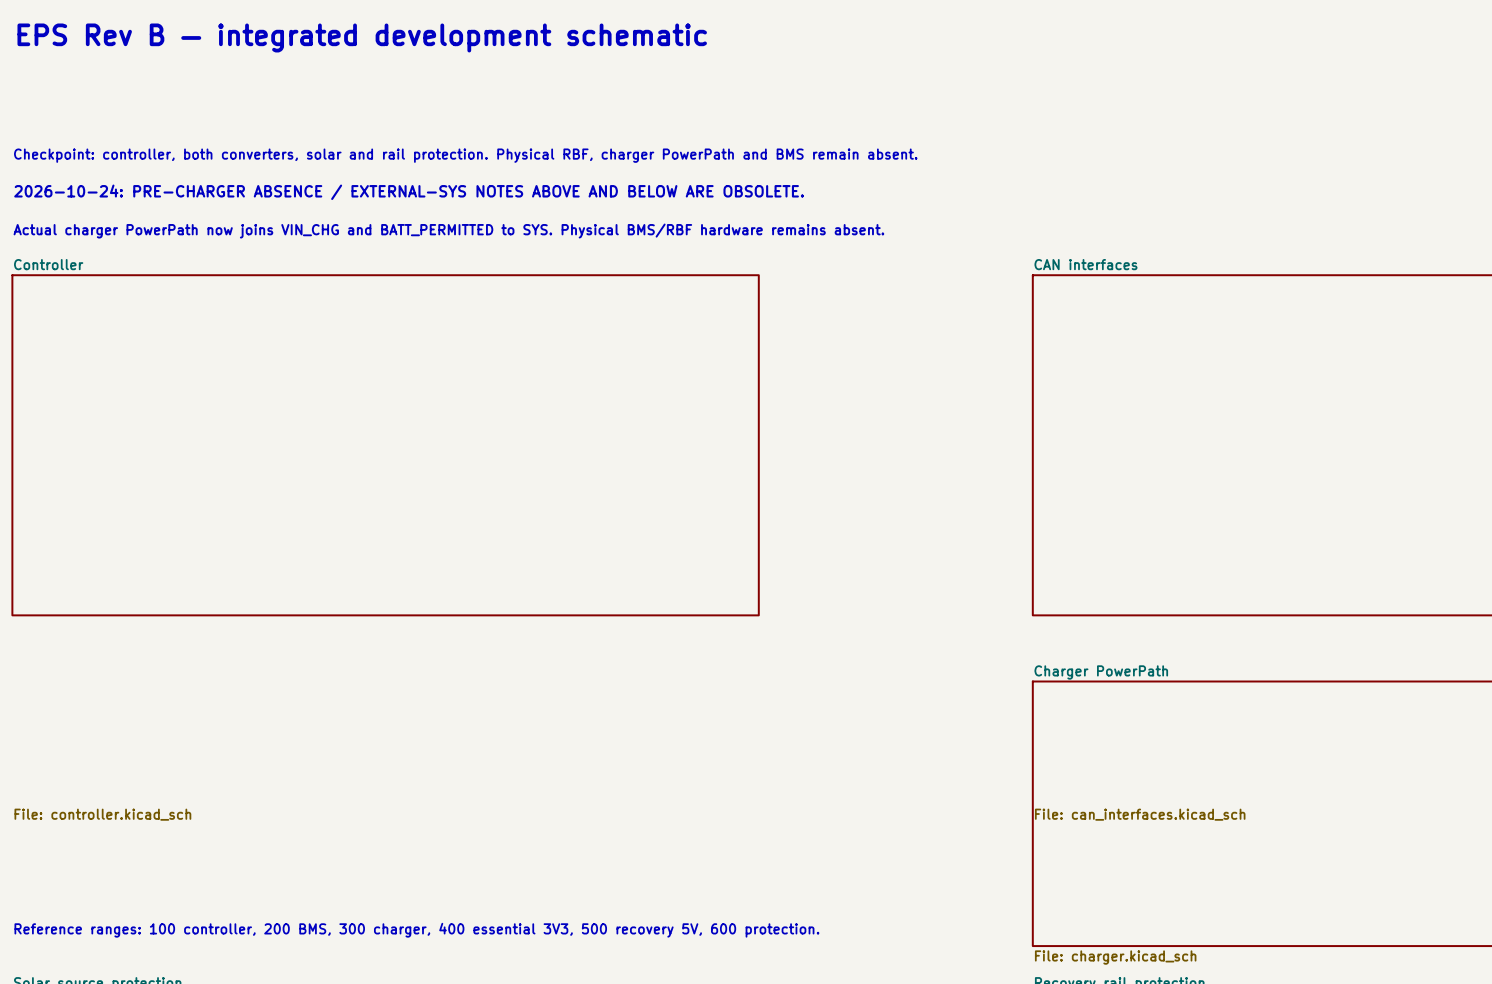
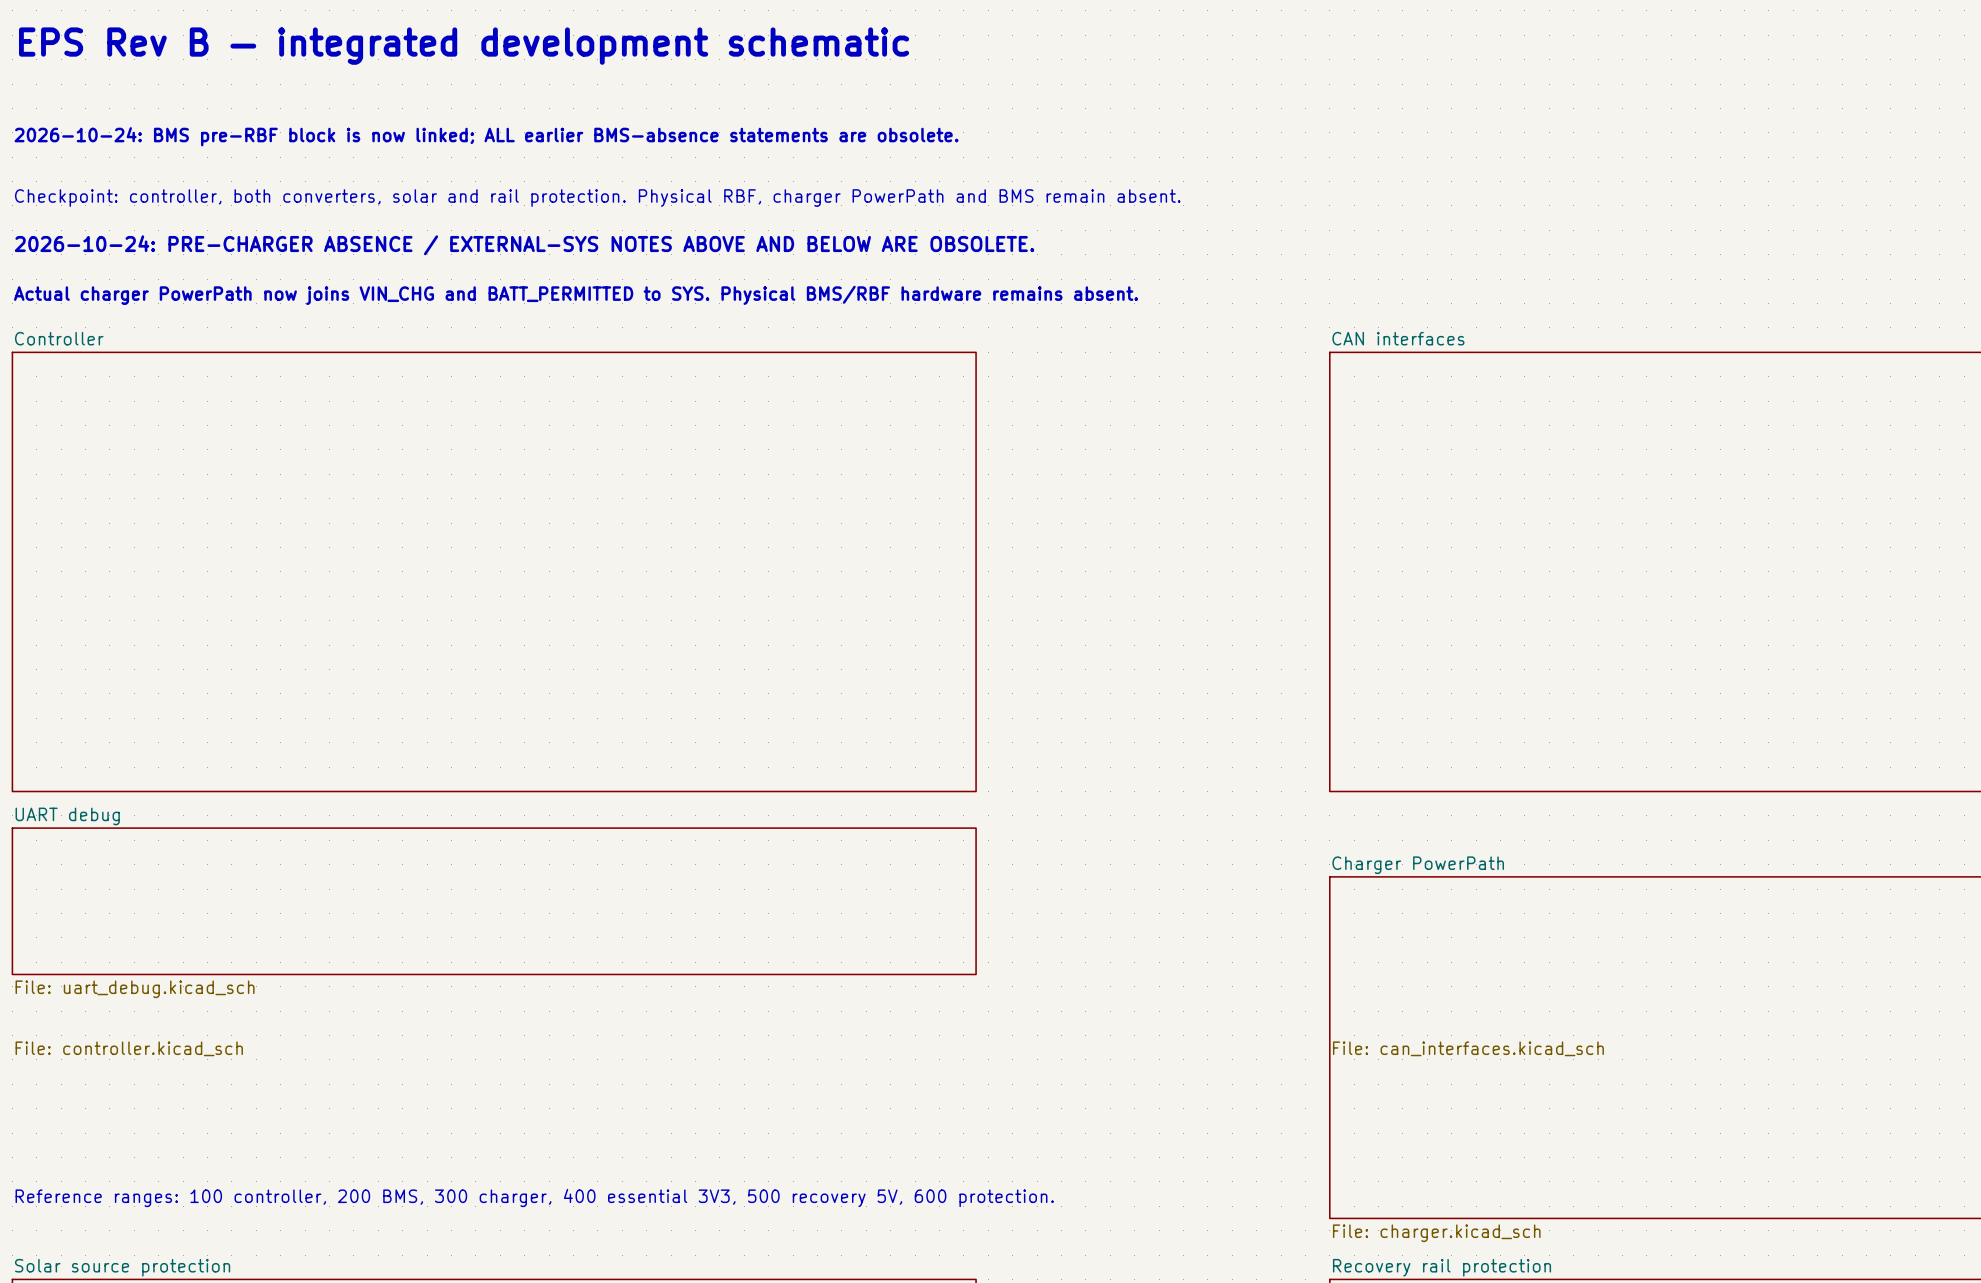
text: none -> 2026-10-24: BMS pre-RBF block is now linked; ALL earlier BMS-absence statements are obsolete. (486, 136)
sheet UART debug: none -> File: uart_debug.kicad_sch (494, 901)

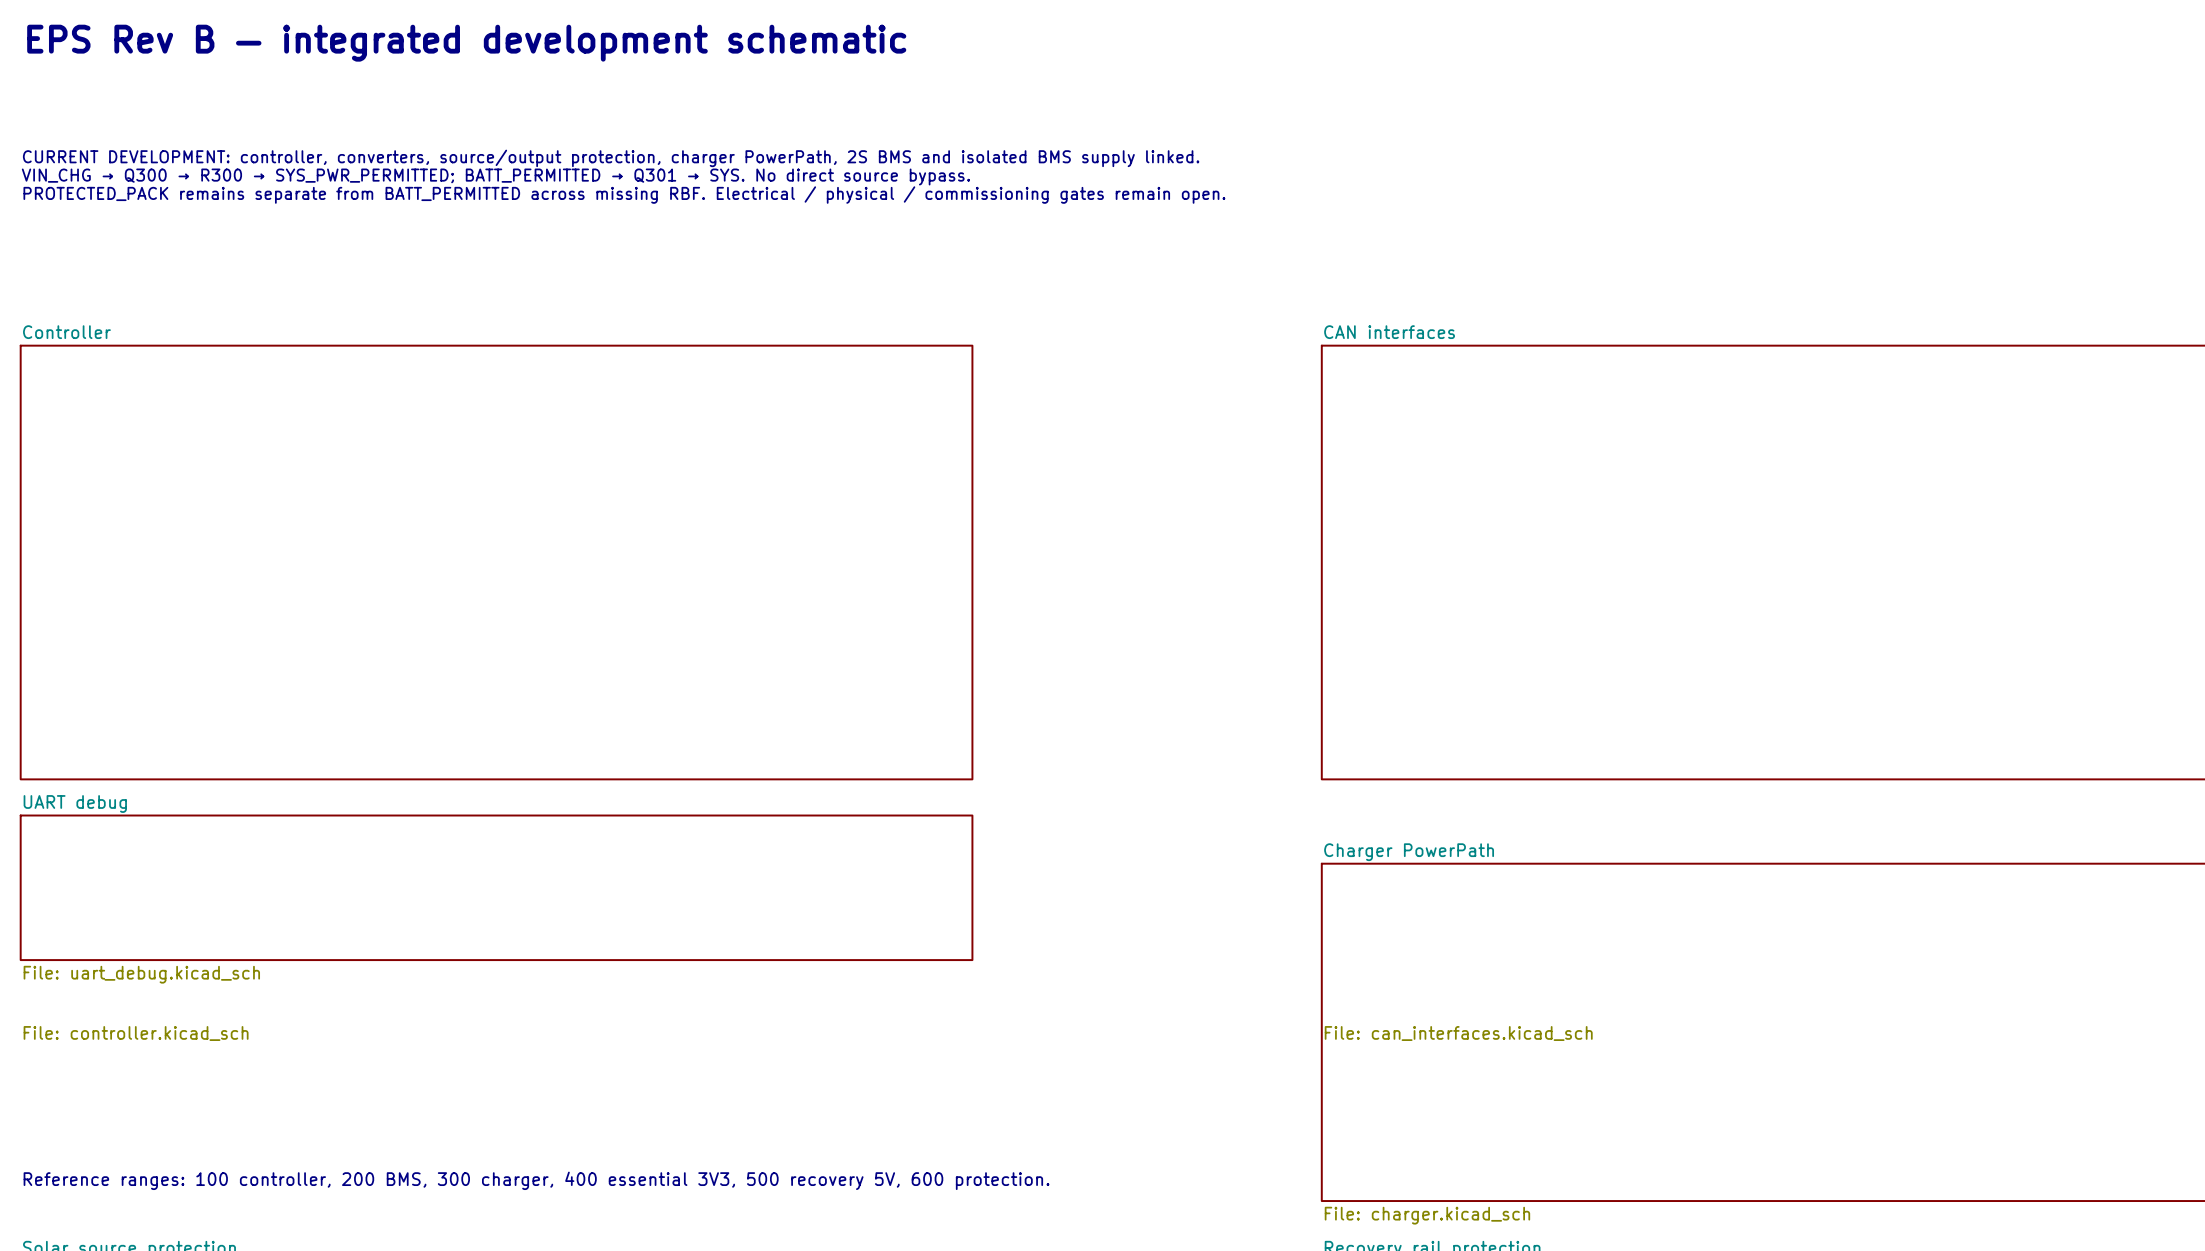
text: 2026-10-24: BMS pre-RBF block is now linked; ALL earlier BMS-absence statements are obsolete. (486, 136) -> none
text: none -> CURRENT DEVELOPMENT: controller, converters, source/output protection, charger PowerPath, 2S BMS and isolated BMS supply linked. (611, 158)
text: none -> VIN_CHG → Q300 → R300 → SYS_PWR_PERMITTED; BATT_PERMITTED → Q301 → SYS. No direct source bypass. (495, 176)
text: Checkpoint: controller, both converters, solar and rail protection. Physical RBF, charger PowerPath and BMS remain absent. (597, 198) -> none
text: none -> PROTECTED_PACK remains separate from BATT_PERMITTED across missing RBF. Electrical / physical / commissioning gates remain open. (624, 195)
text: 2026-10-24: PRE-CHARGER ABSENCE / EXTERNAL-SYS NOTES ABOVE AND BELOW ARE OBSOLETE. (524, 245) -> none
text: Actual charger PowerPath now joins VIN_CHG and BATT_PERMITTED to SYS. Physical BMS/RBF hardware remains absent. (575, 295) -> none

